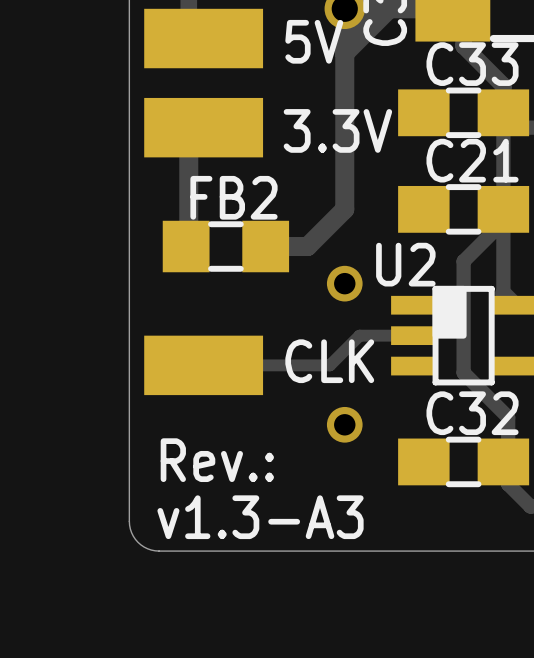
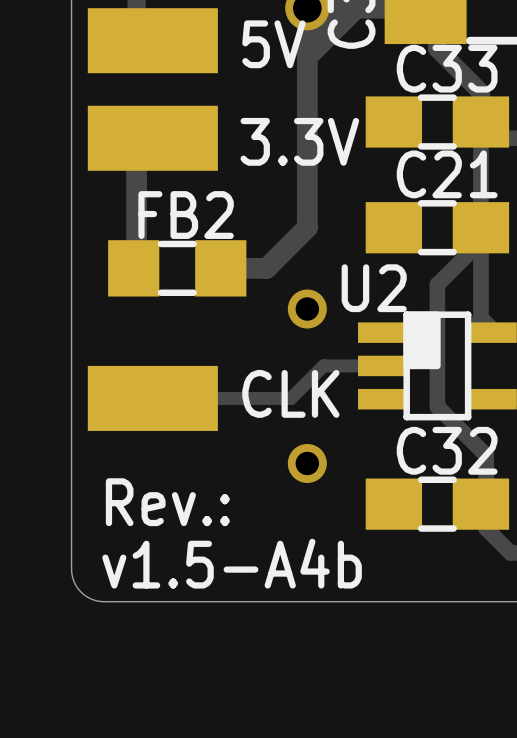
text: v1.3-A3 (260, 517) -> v1.5-A4b (232, 563)

